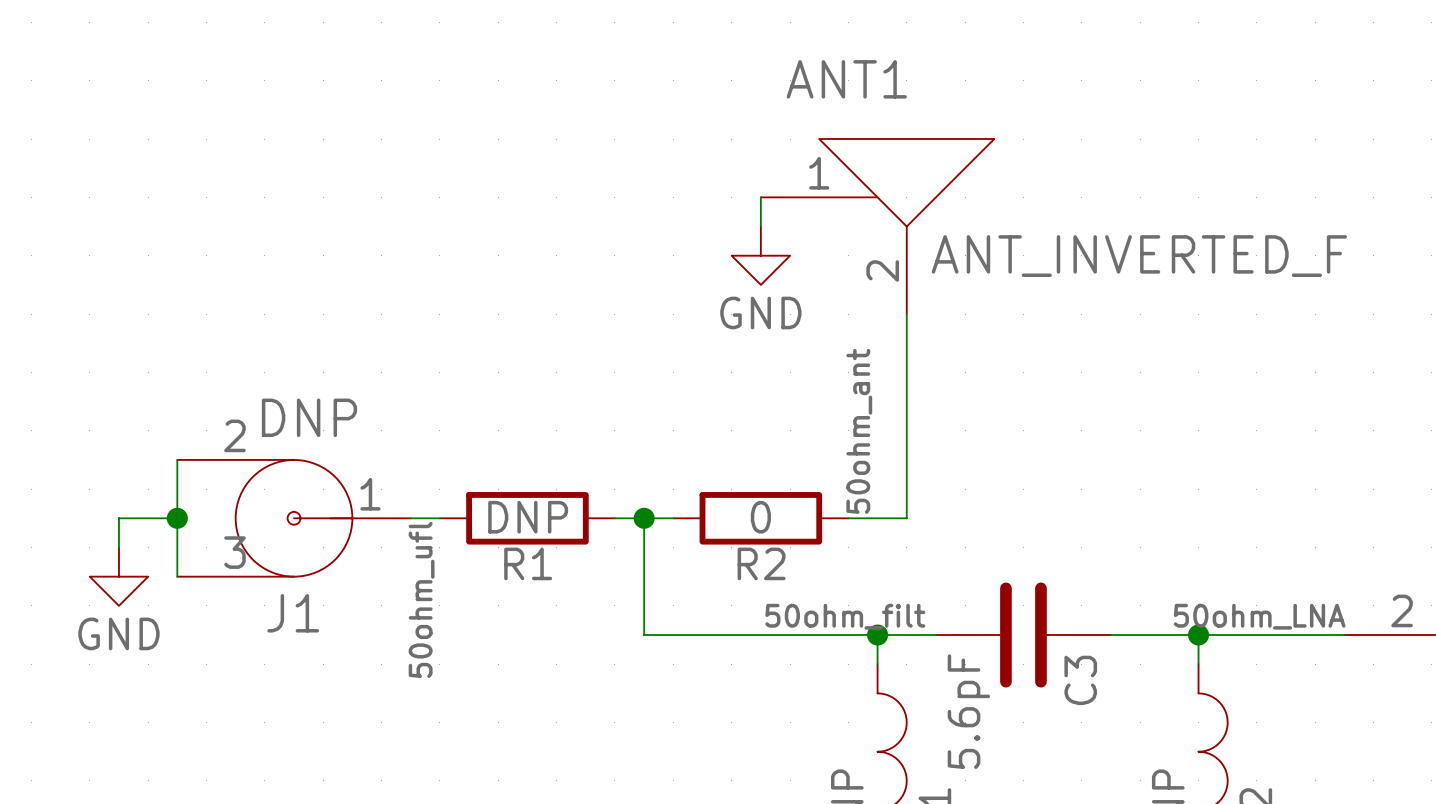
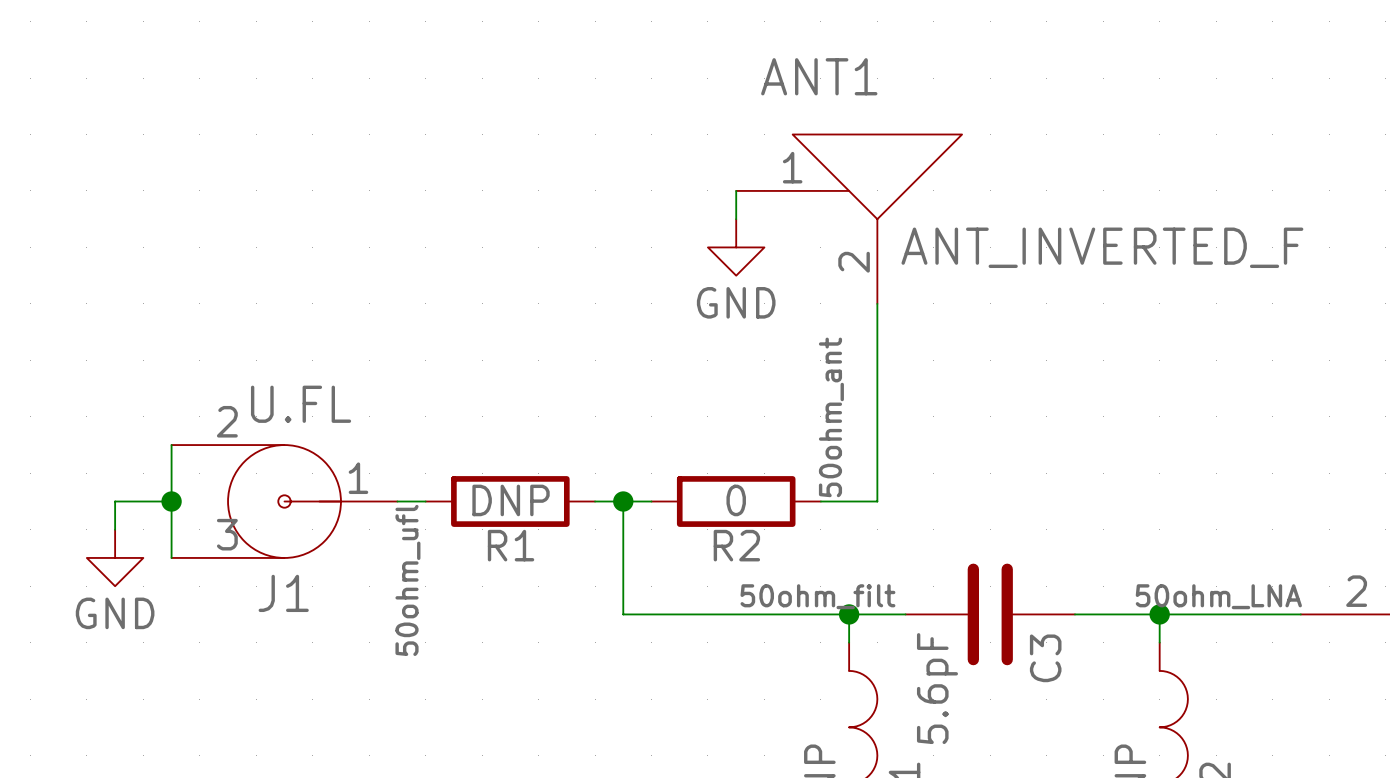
J1 value: DNP (309, 417) -> U.FL (301, 404)

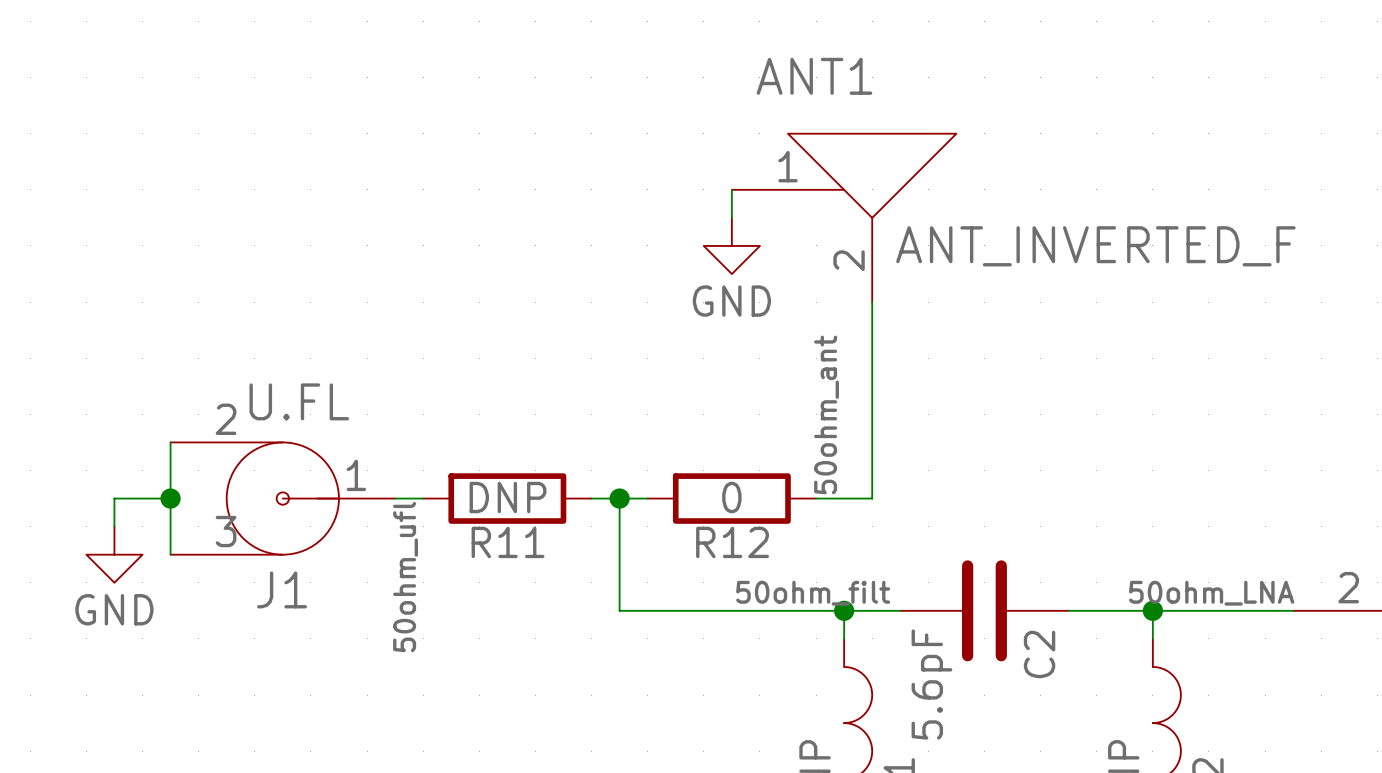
R1 name: R1 (511, 545) -> R11 (508, 542)
R2 name: R2 (736, 545) -> R12 (732, 542)
C3 name: C3 (1045, 658) -> C2 (1039, 654)

